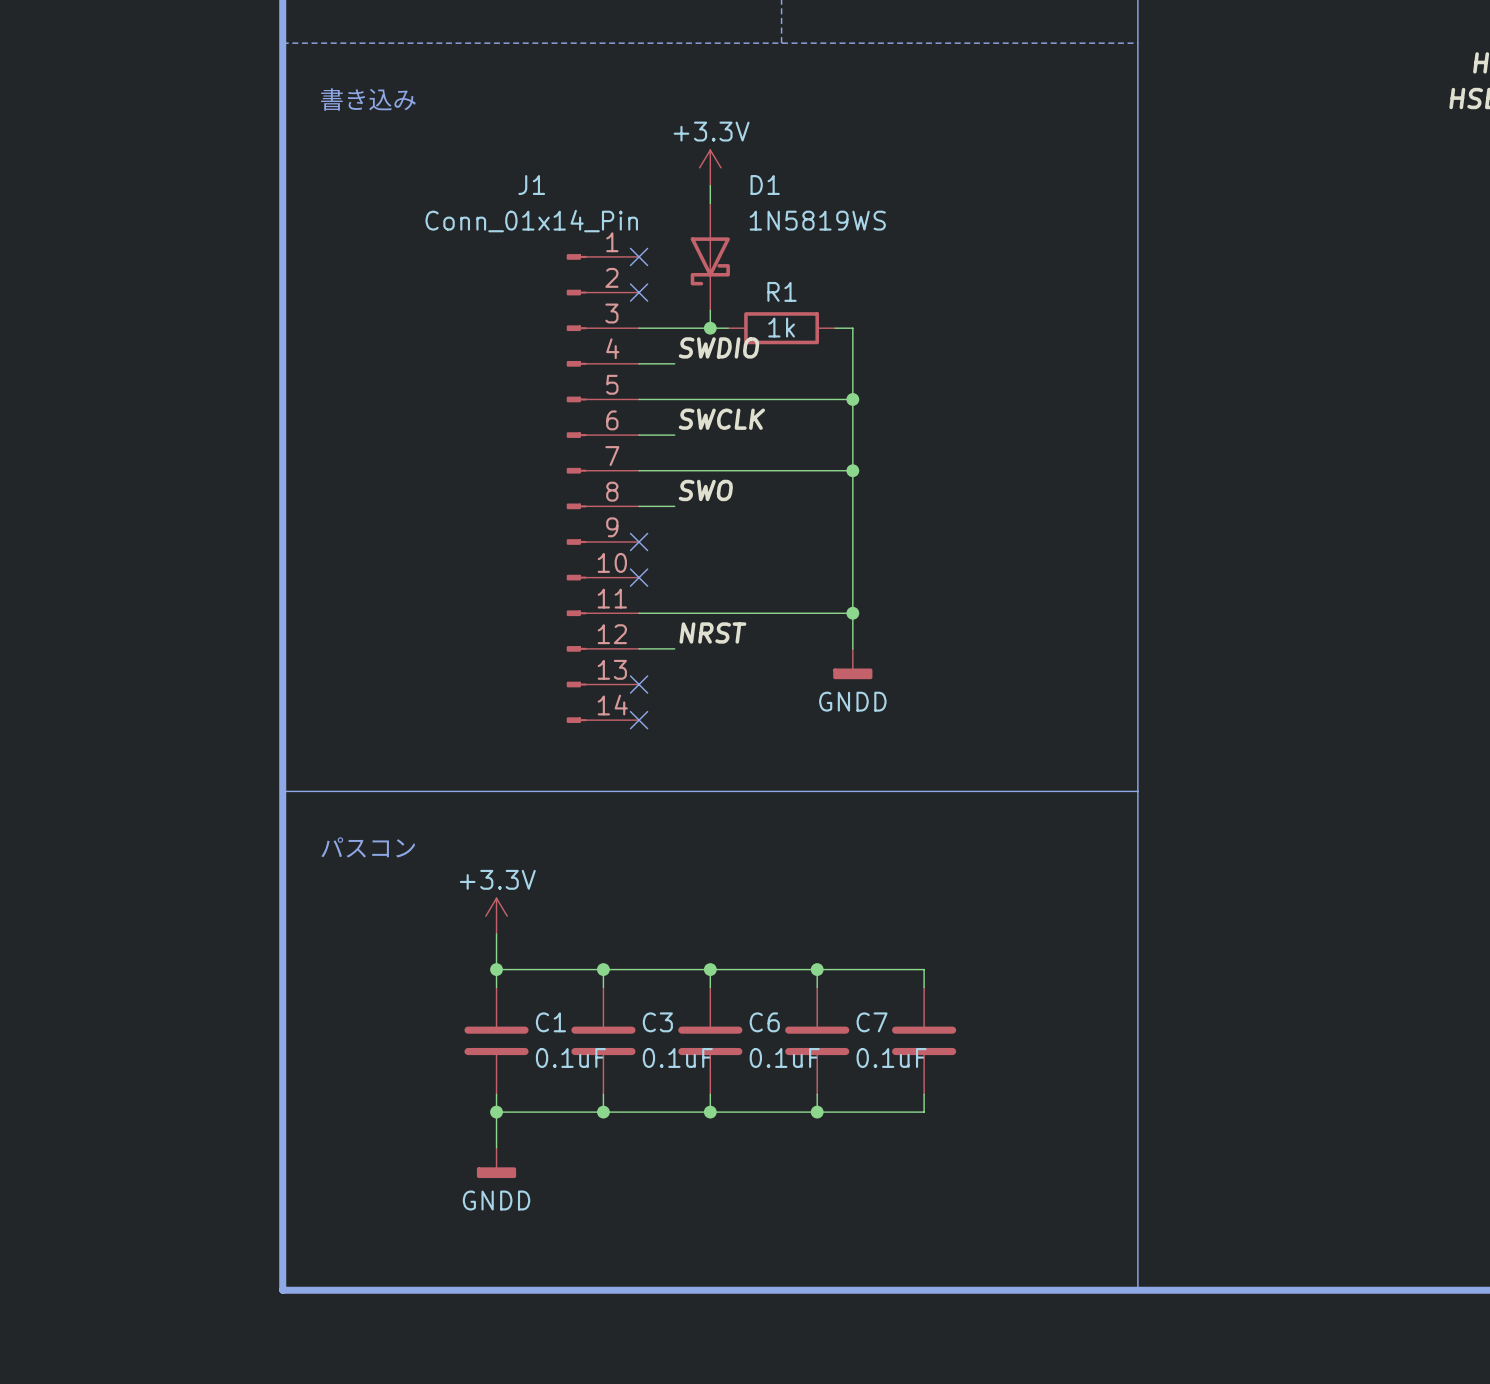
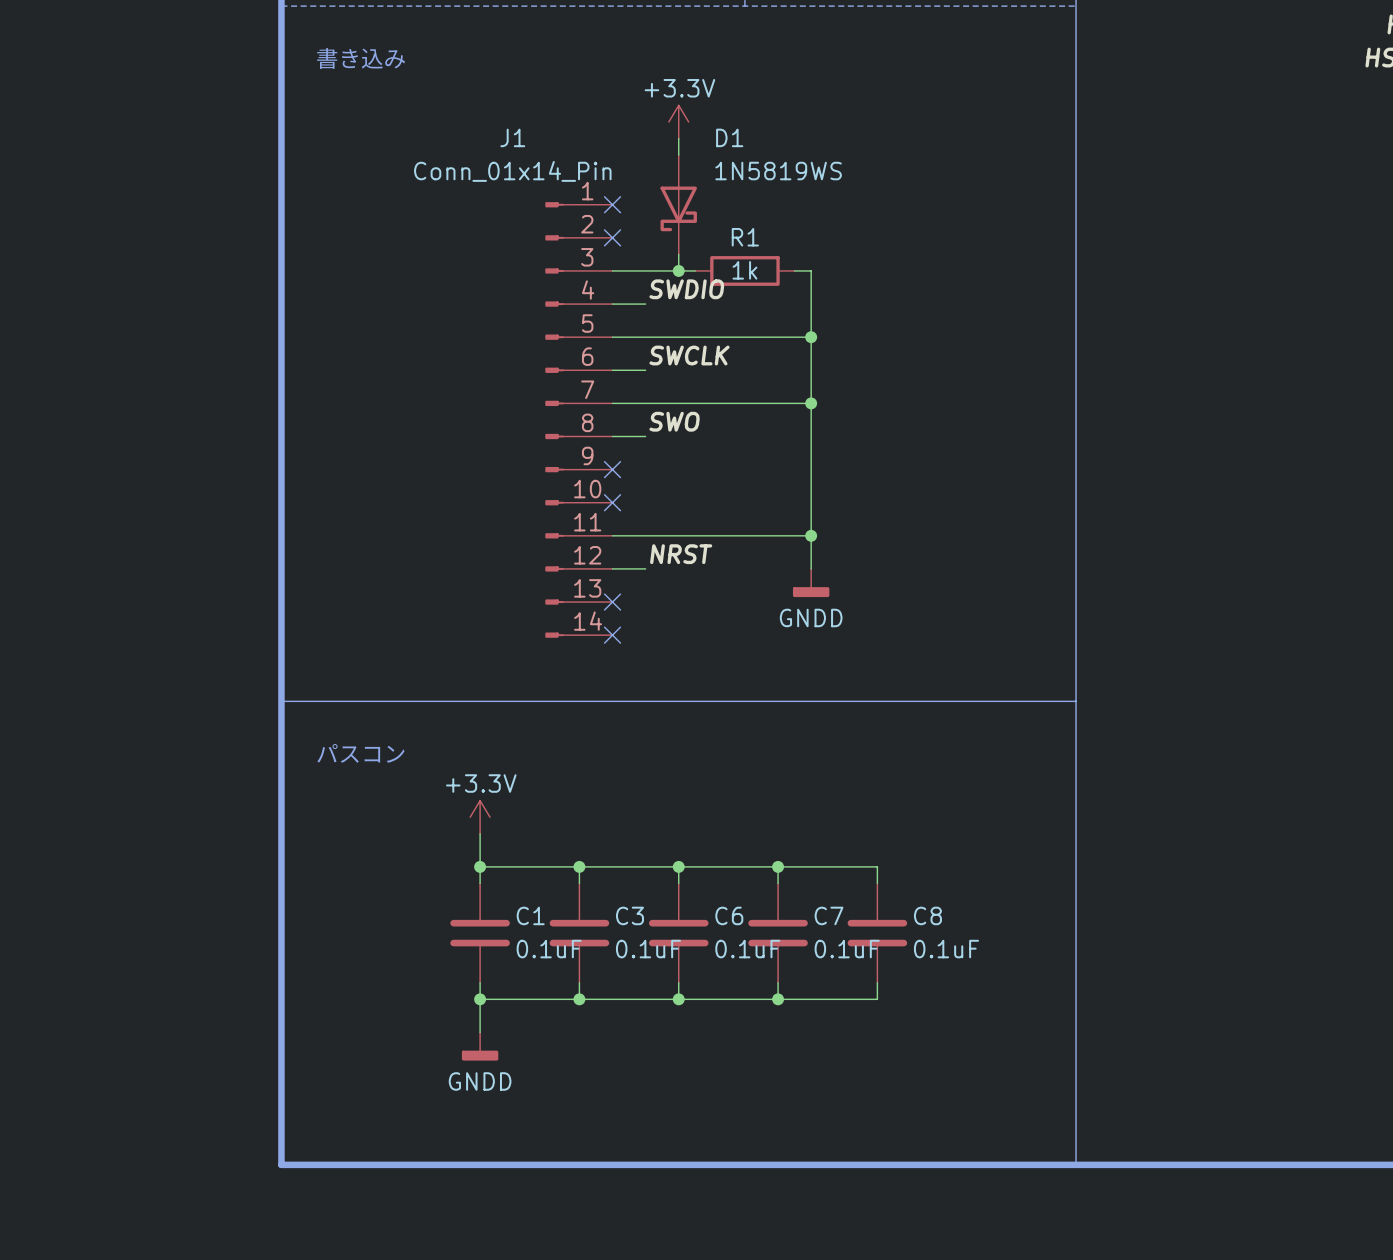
C8 name: none -> C8 (927, 915)
C8 value: none -> 0.1uF (946, 949)

